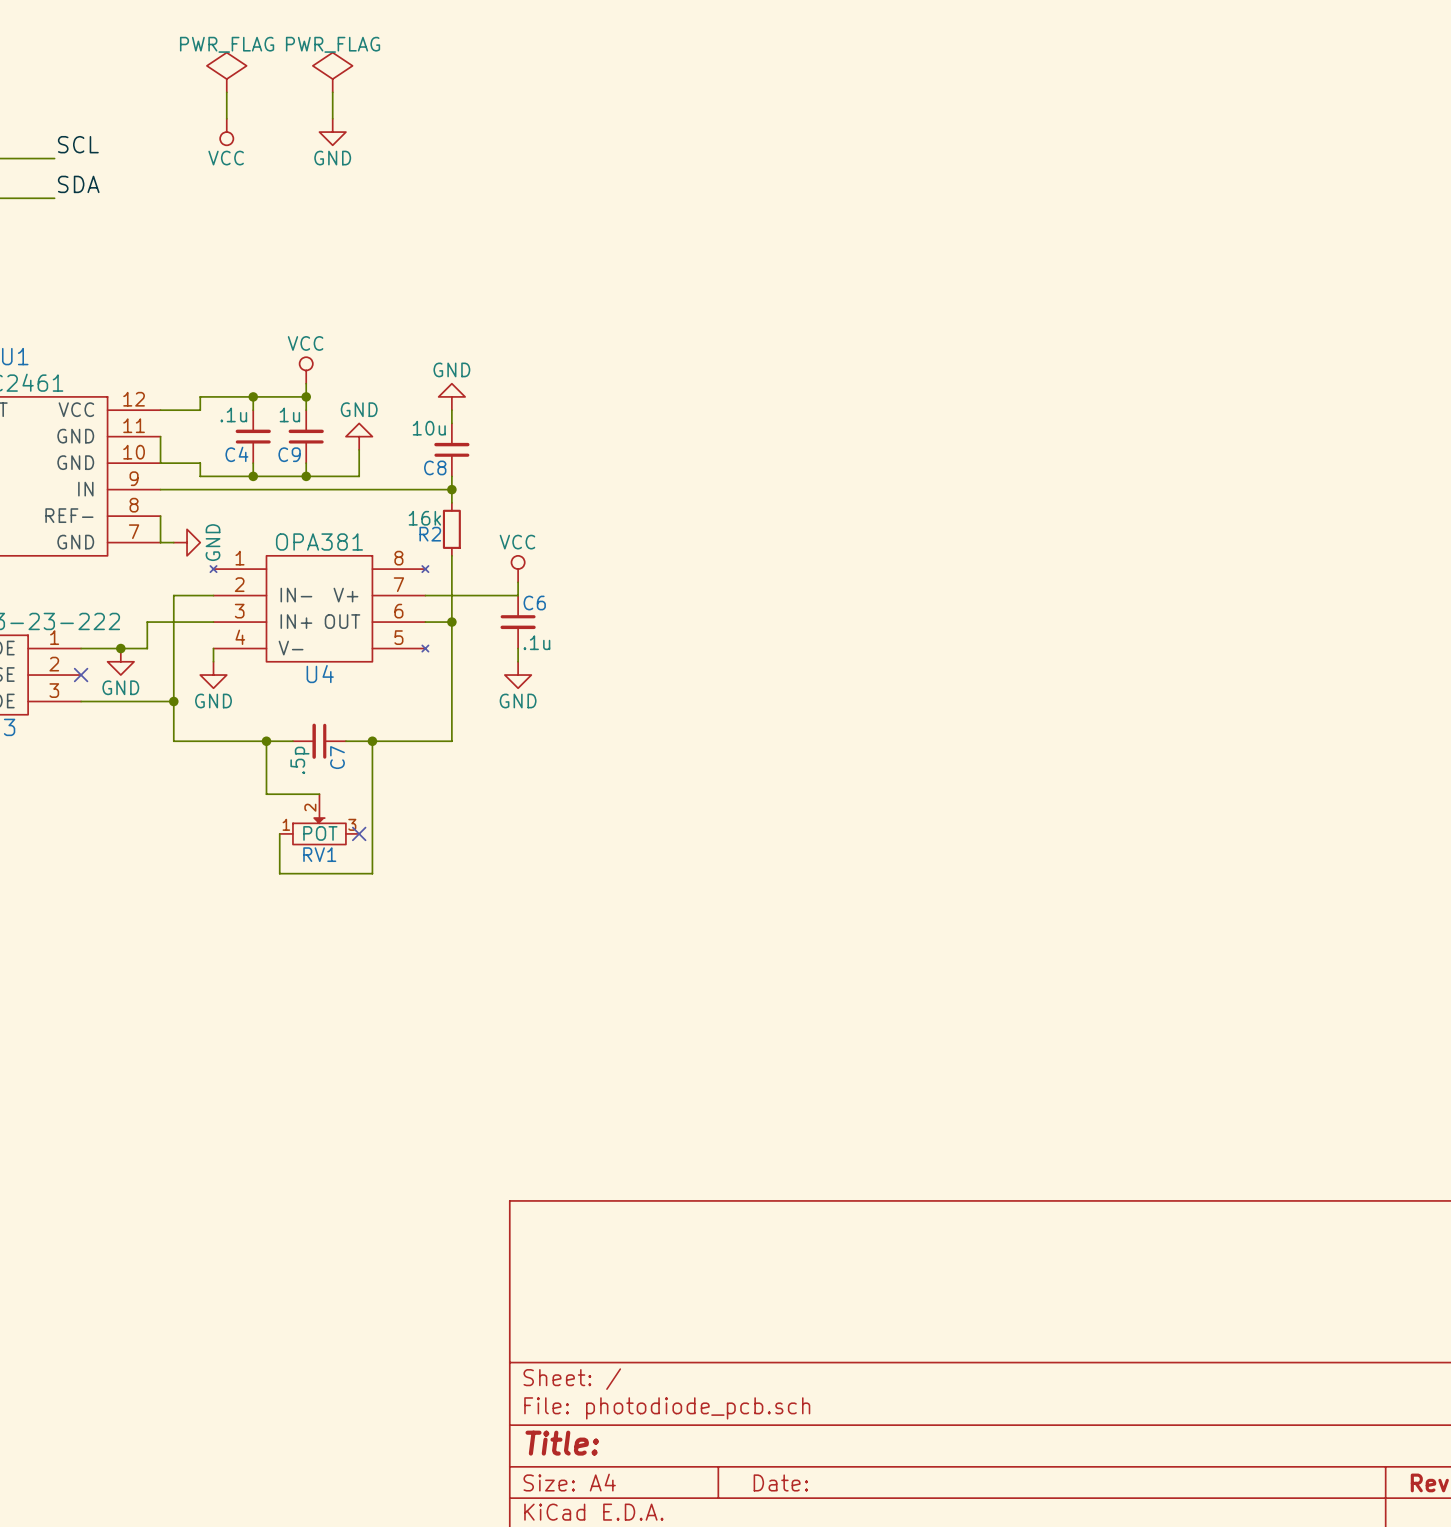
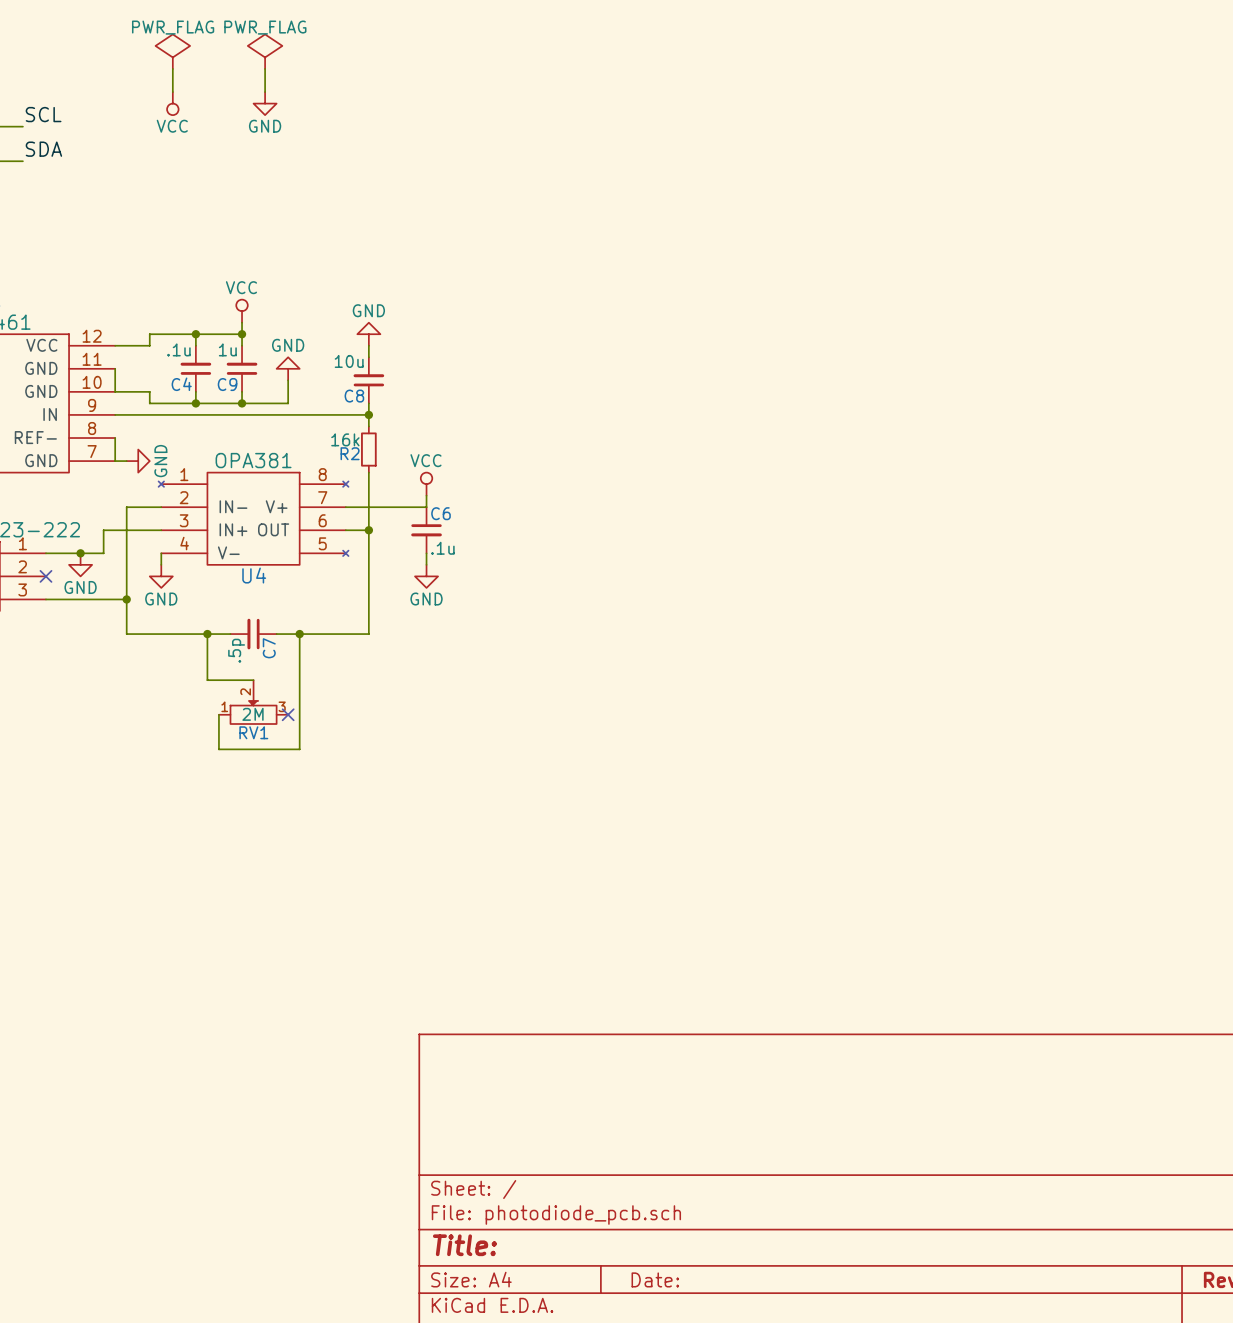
RV1 value: POT (320, 833) -> 2M (253, 714)

